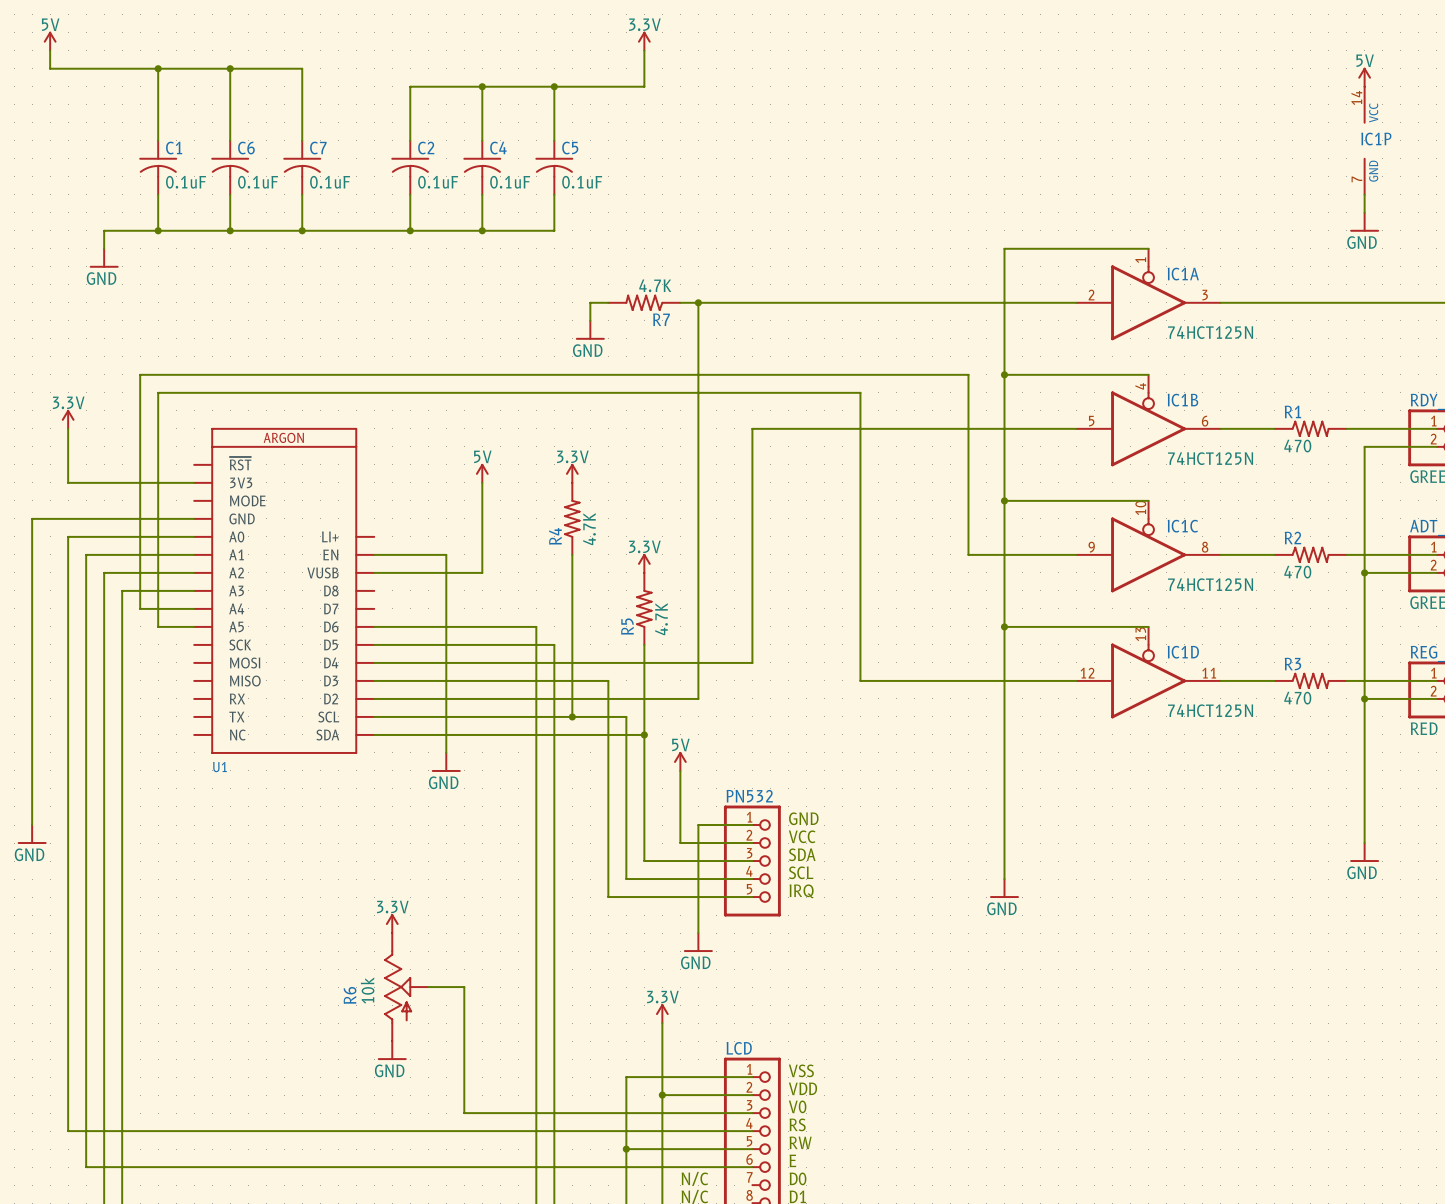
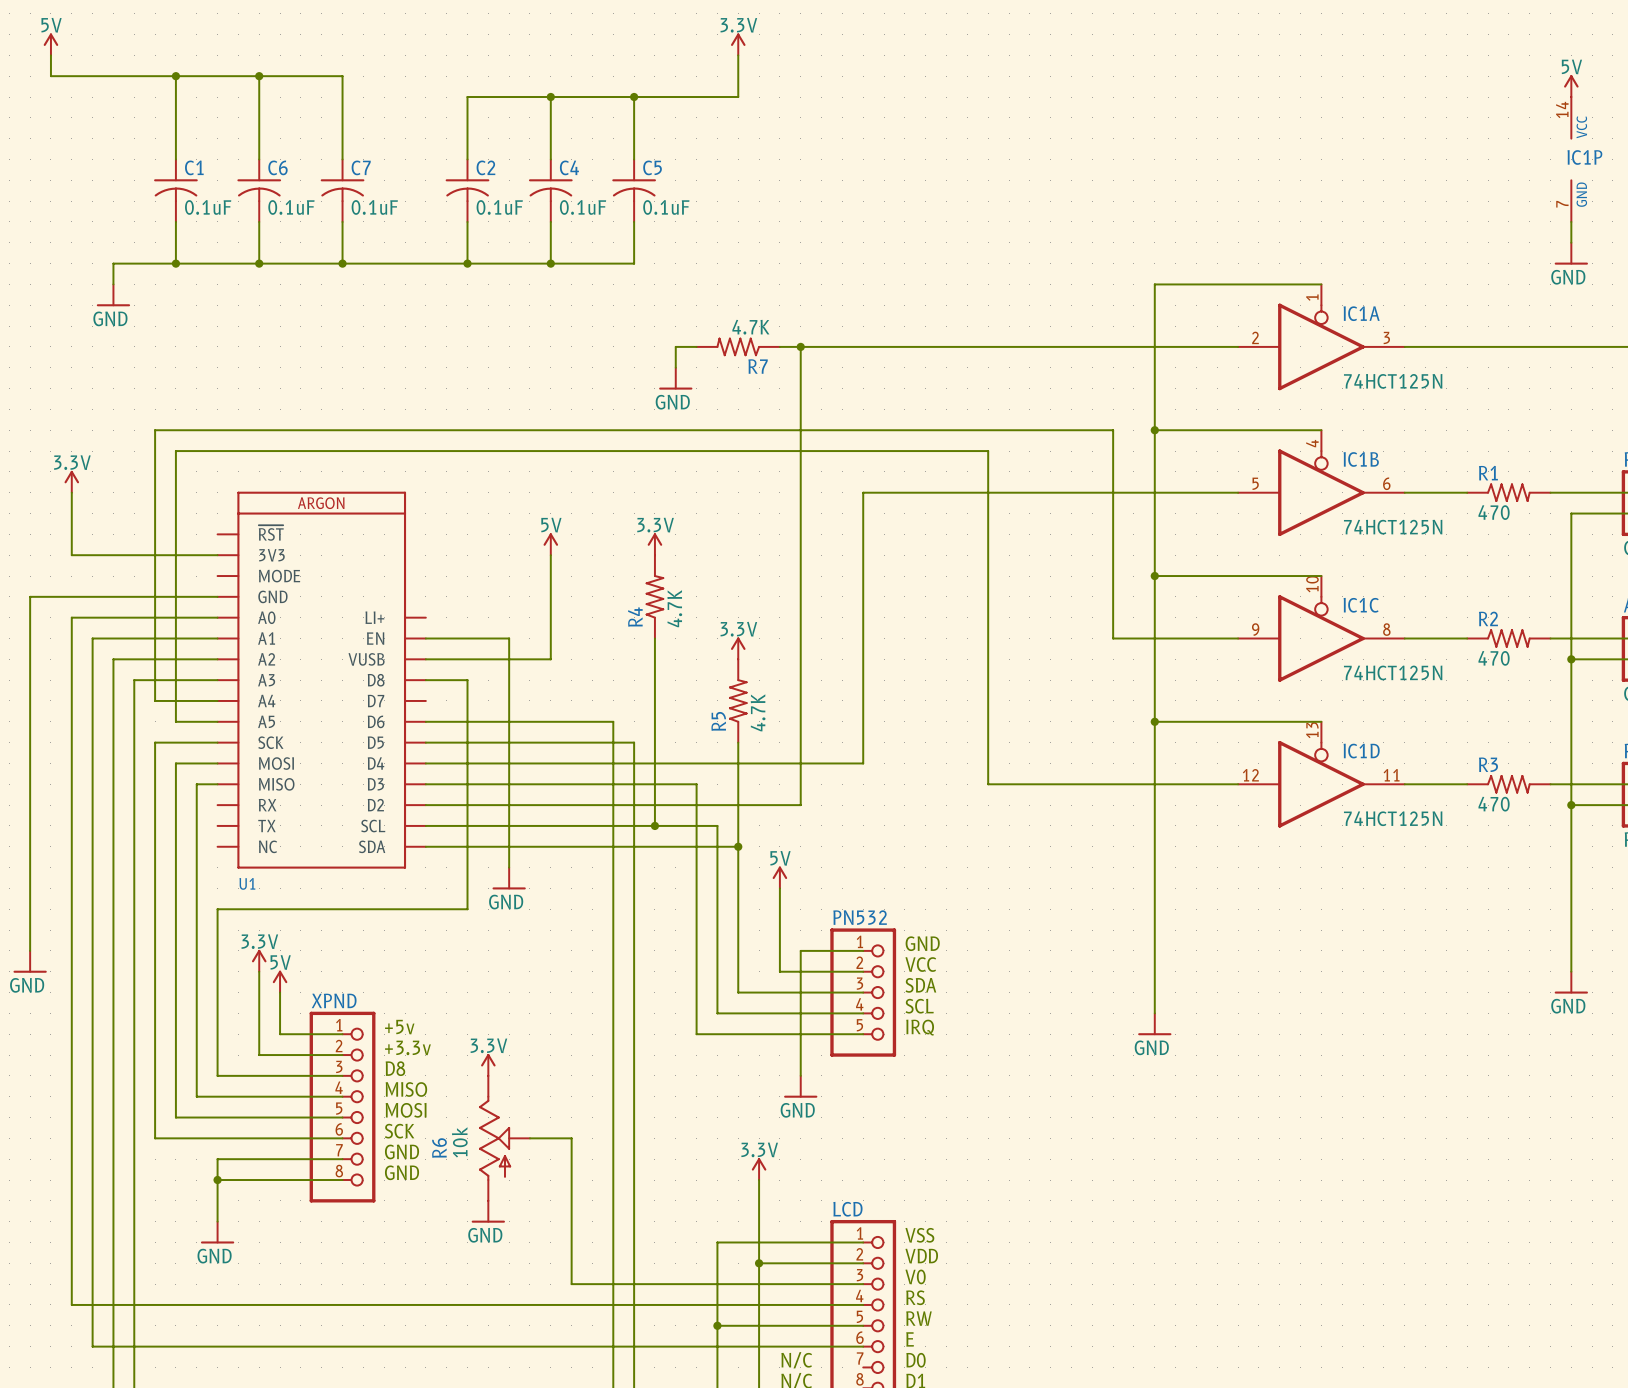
wire: none -> (425, 680) (467, 680) (467, 909) (217, 909) (217, 1075) (342, 1075)
wire: none -> (217, 742) (155, 742) (155, 1138) (342, 1138)
wire: none -> (217, 763) (175, 763) (175, 1117) (342, 1117)
wire: none -> (217, 784) (196, 784) (196, 1096) (342, 1096)
power symbol: none -> 3.3V (259, 960)
wire: none -> (259, 971) (259, 1055) (342, 1055)
power symbol: none -> 5V (280, 981)
wire: none -> (280, 992) (280, 1034) (342, 1034)
text: none -> +5v (399, 1027)
text: none -> +3.3v (407, 1047)
power symbol position: 3.3V (392, 923) -> 3.3V (488, 1064)
text: none -> D8 (395, 1068)
text: none -> MISO (406, 1089)
XPND: none -> (342, 1107)
text: none -> MOSI (406, 1110)
text: none -> SCK (399, 1131)
R6 position: (406, 987) -> (504, 1138)
wire: (428, 987) (464, 987) (464, 1113) (500, 1113) -> (529, 1138) (571, 1138) (571, 1284)
text: none -> GND (402, 1151)
wire: none -> (342, 1159) (217, 1159) (217, 1221)
text: none -> GND (402, 1172)
wire: none -> (217, 1180) (342, 1180)
junction: none -> (217, 1180)
power symbol position: GND (392, 1050) -> GND (488, 1211)
power symbol: none -> GND (217, 1232)

